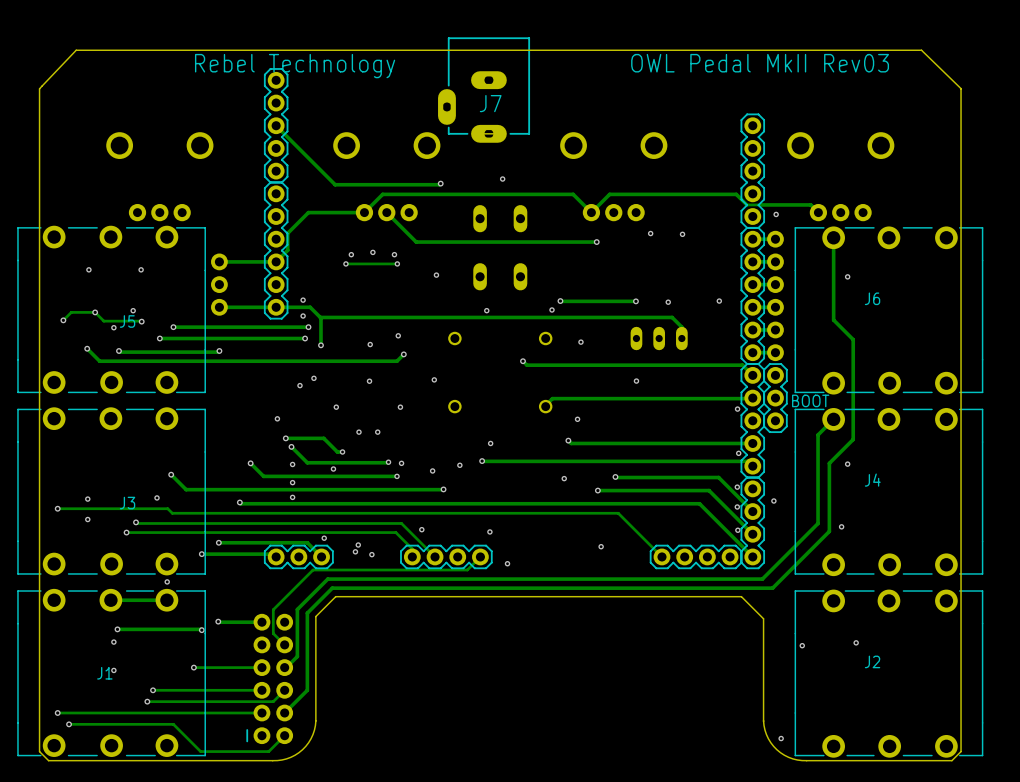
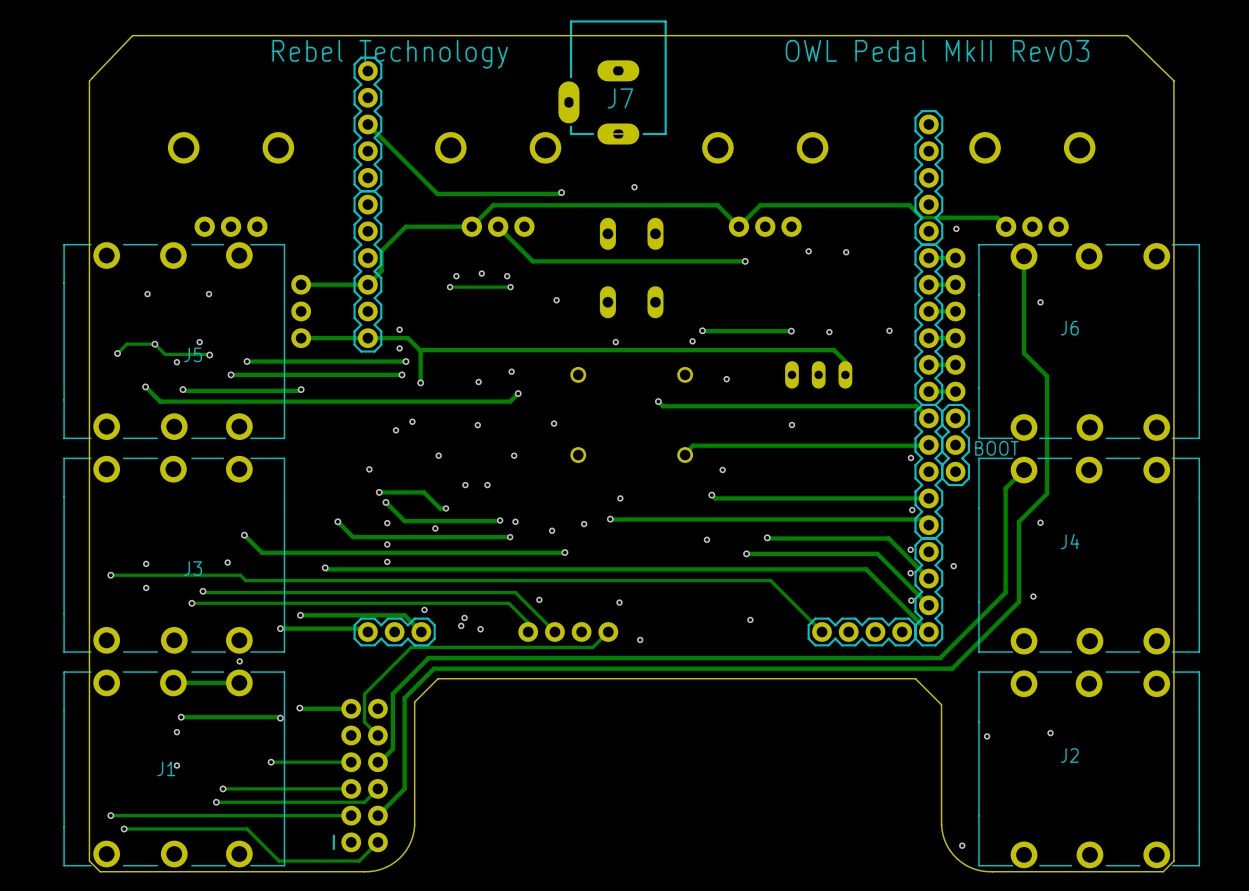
part side: bottom (446, 556) -> top (568, 631)

